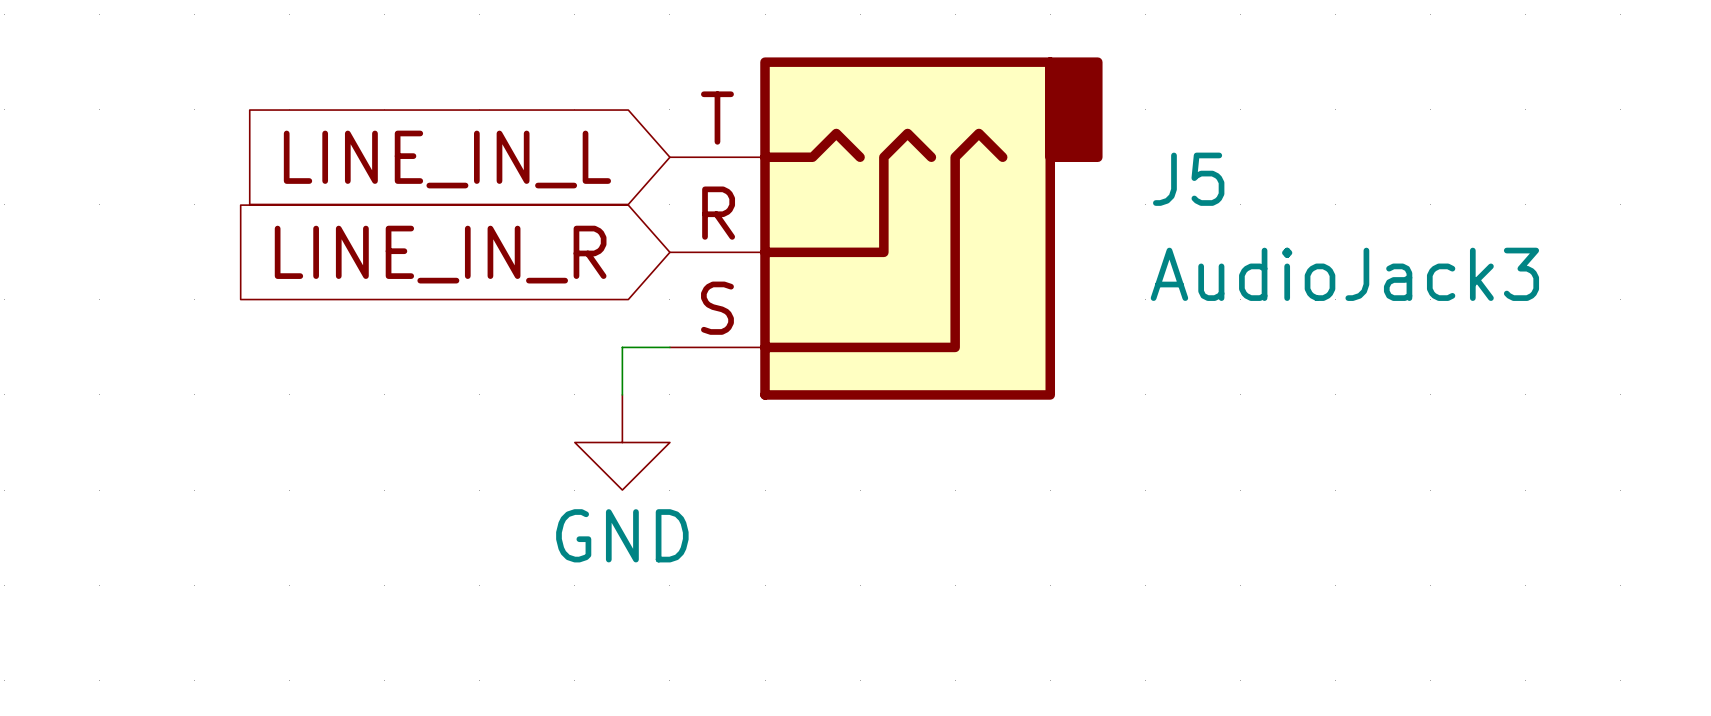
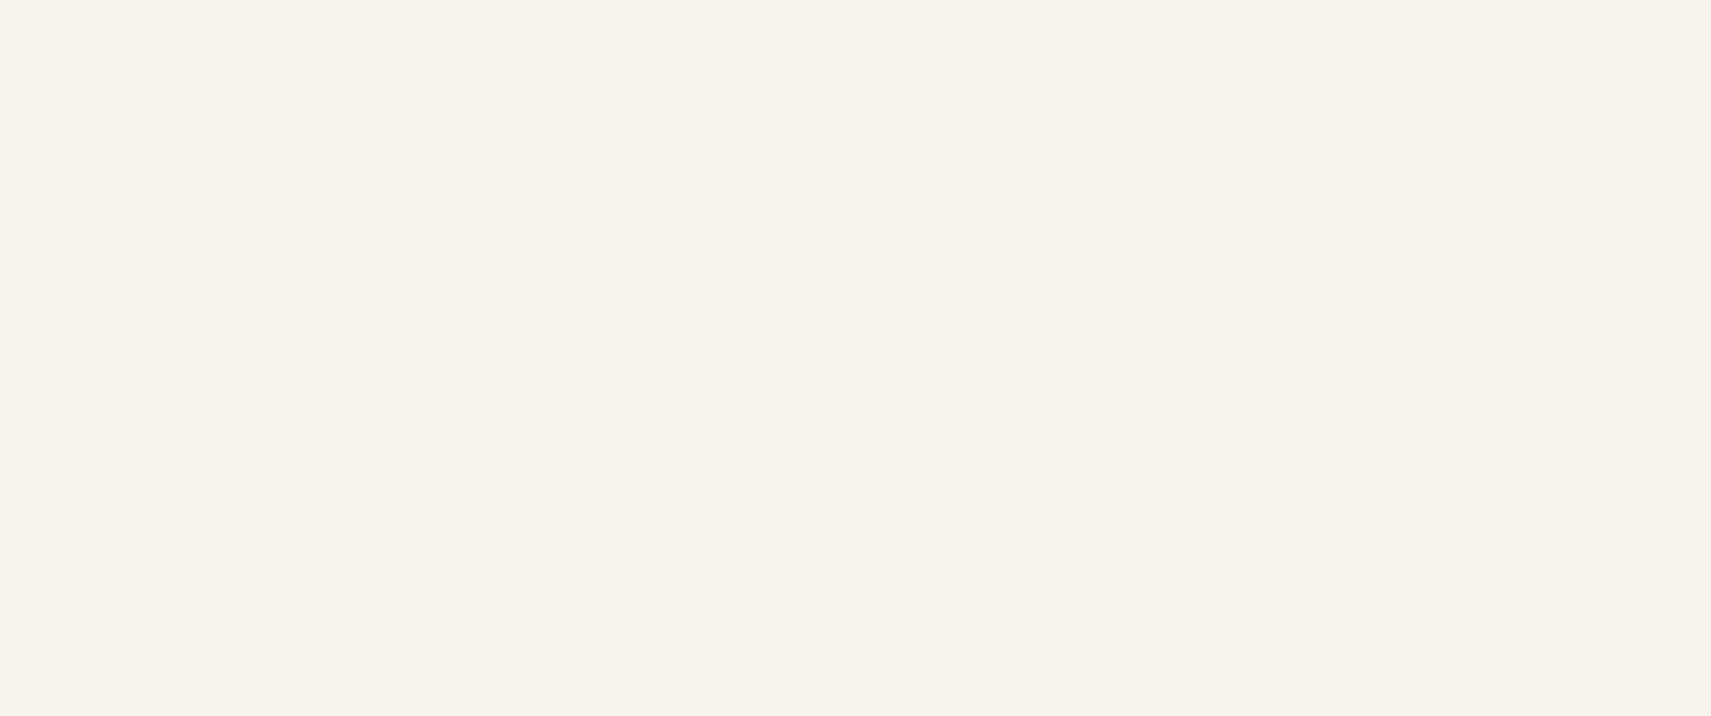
global label: LINE_IN_L (447, 159) -> none
J5: AudioJack3 (886, 228) -> none
global label: LINE_IN_R (440, 254) -> none
wire: (669, 347) (622, 347) (622, 394) -> none
power symbol: GND (622, 442) -> none

